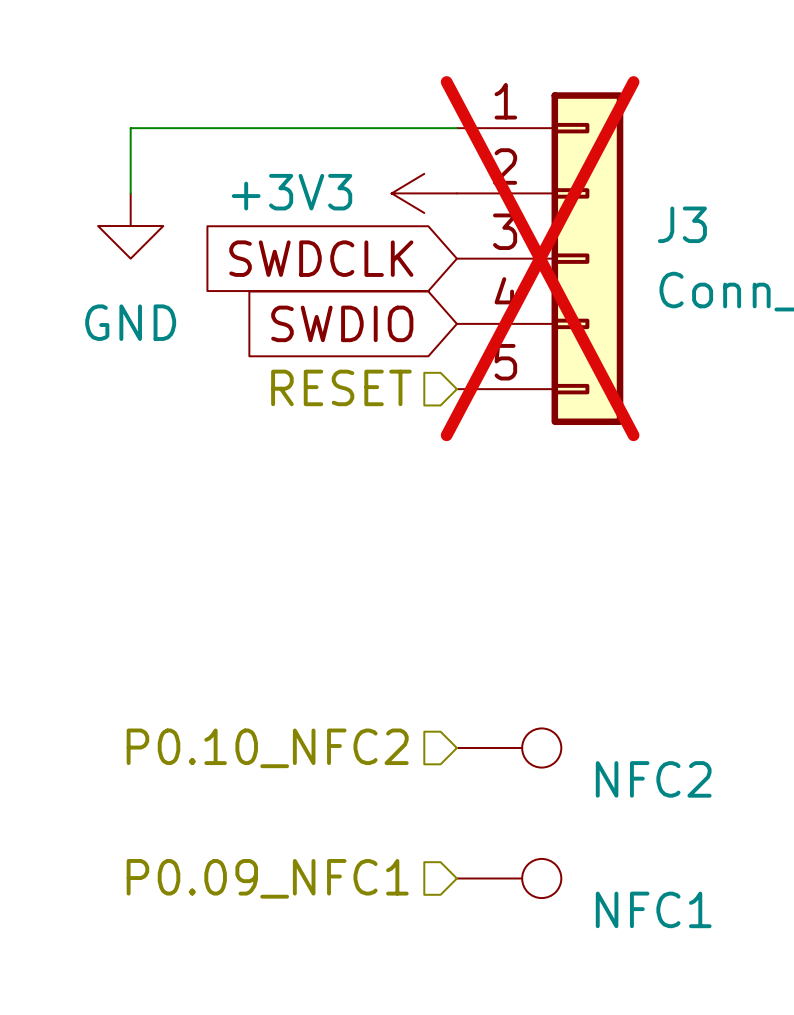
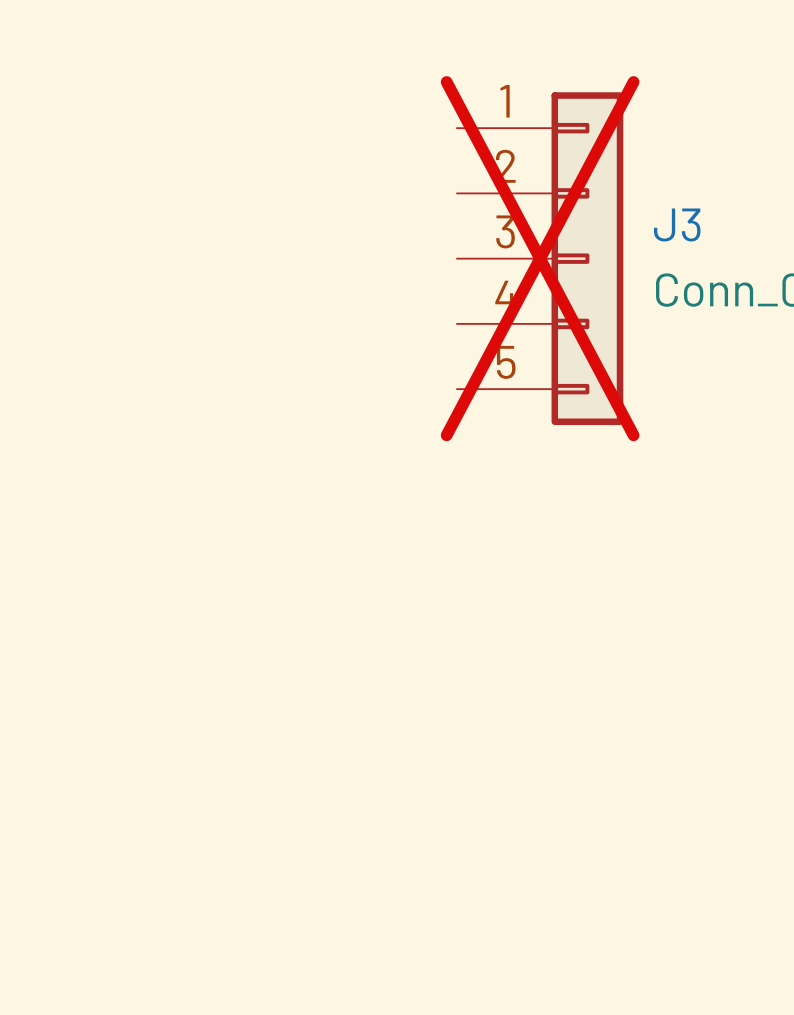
wire: (456, 128) (130, 128) (130, 193) -> none
power symbol: +3V3 (424, 193) -> none
power symbol: GND (130, 226) -> none
global label: SWDCLK (321, 258) -> none
global label: SWDIO (342, 323) -> none
hierarchical label: RESET (341, 387) -> none
hierarchical label: P0.10_NFC2 (267, 748) -> none
part: NFC2 (509, 748) -> none
hierarchical label: P0.09_NFC1 (267, 878) -> none
part: NFC1 (509, 878) -> none

